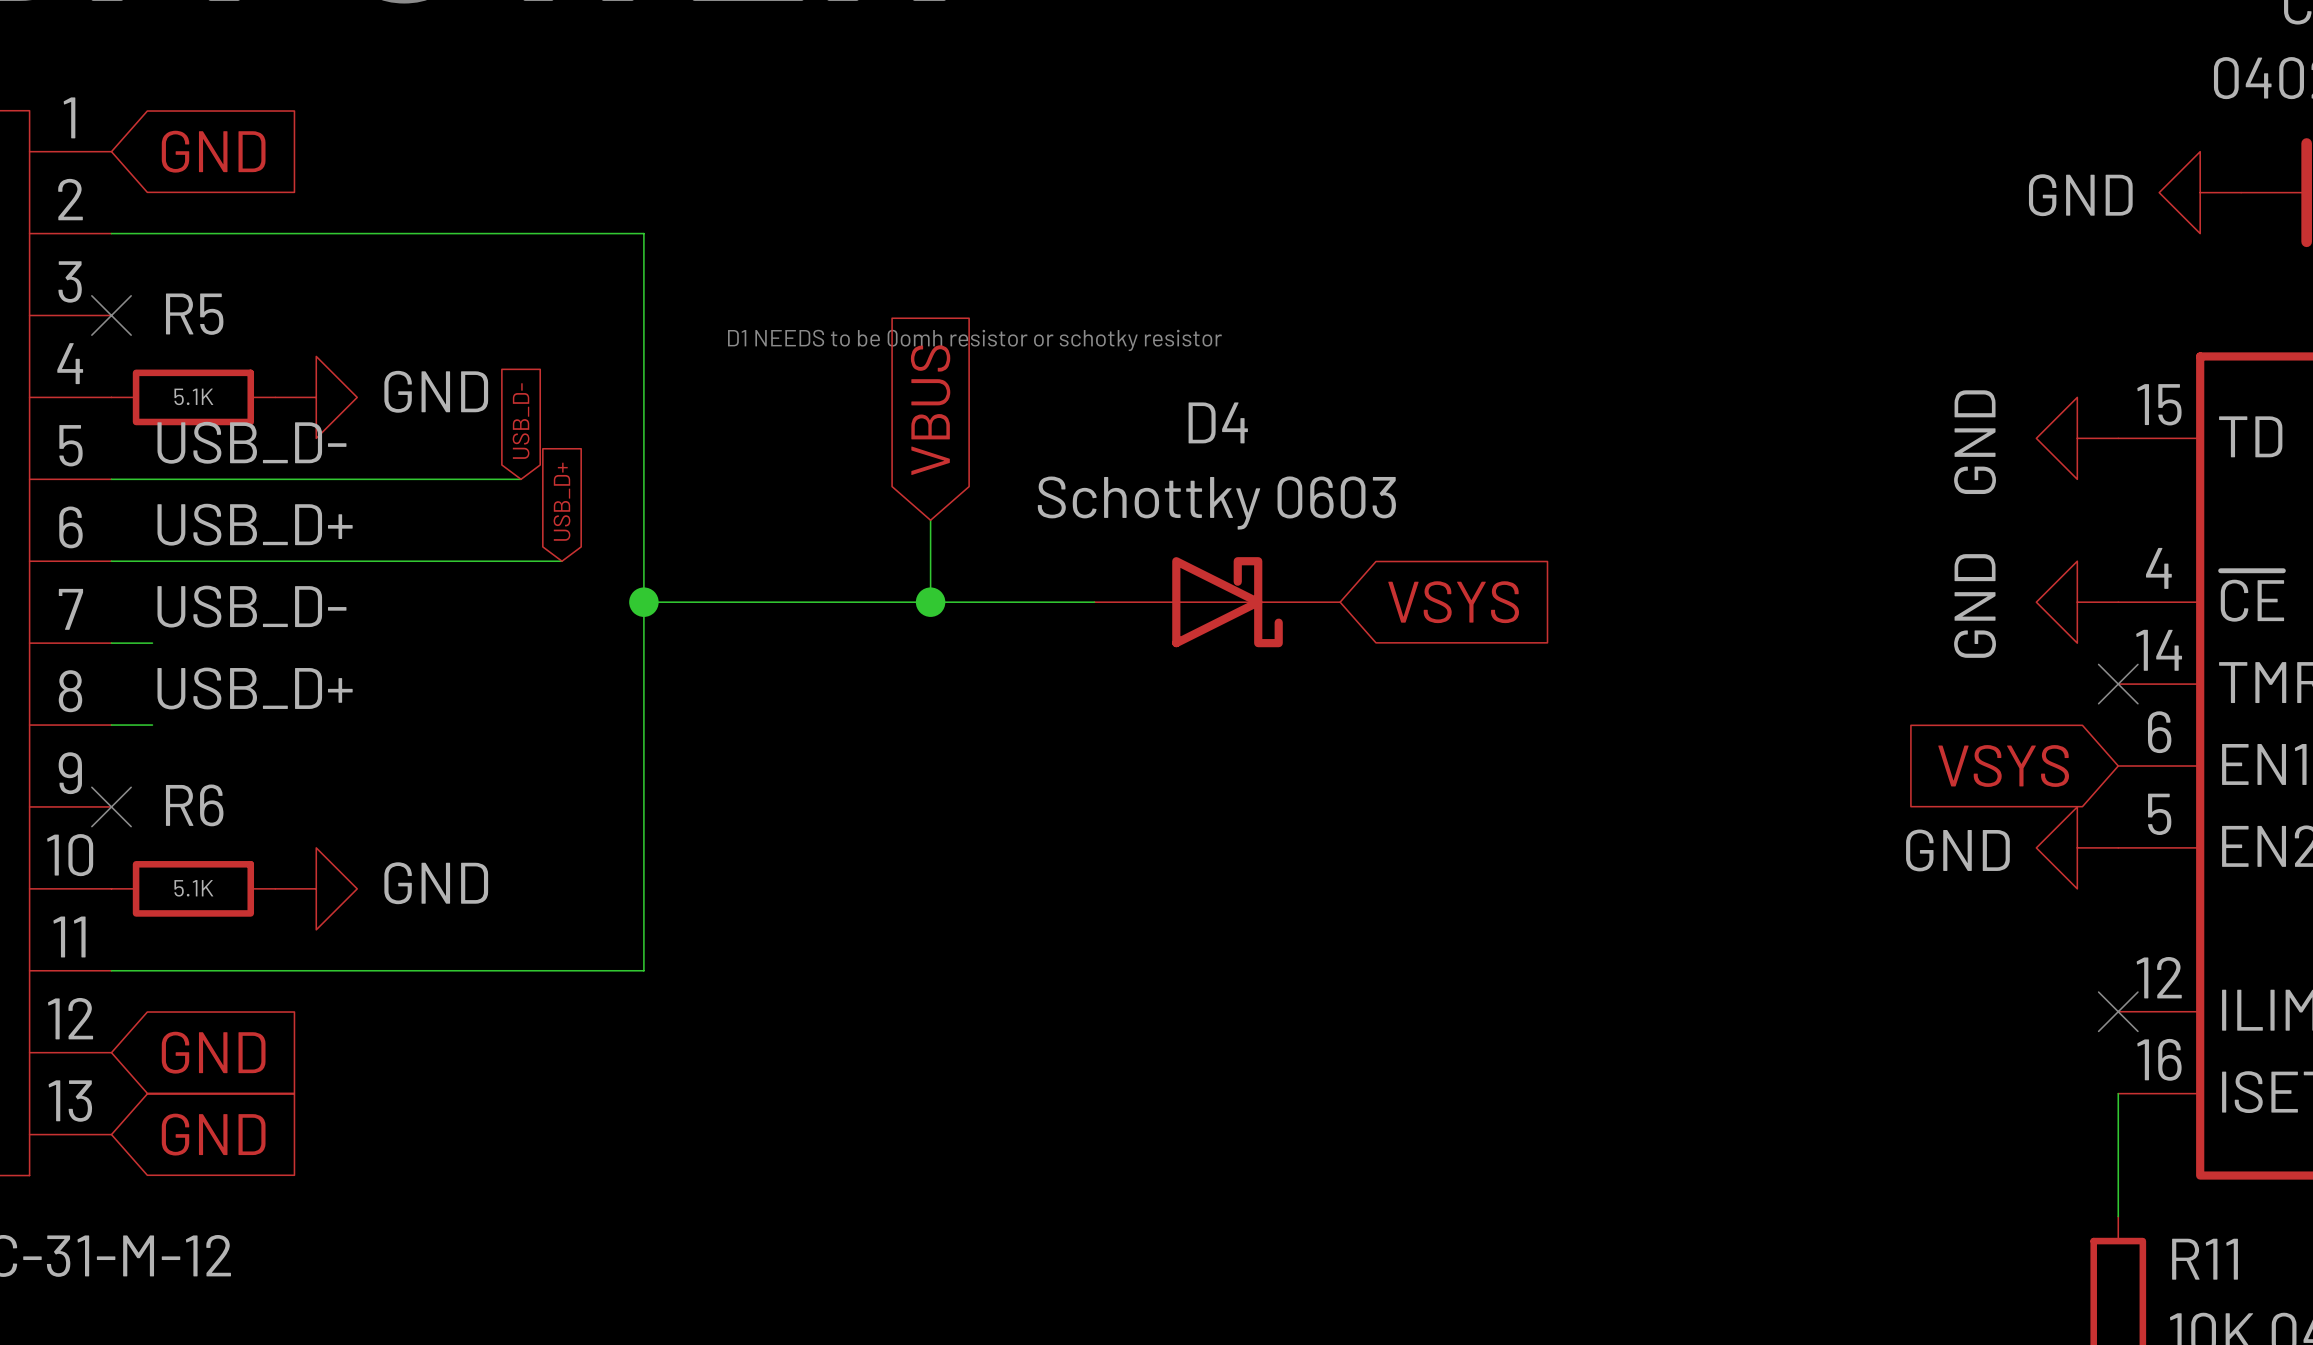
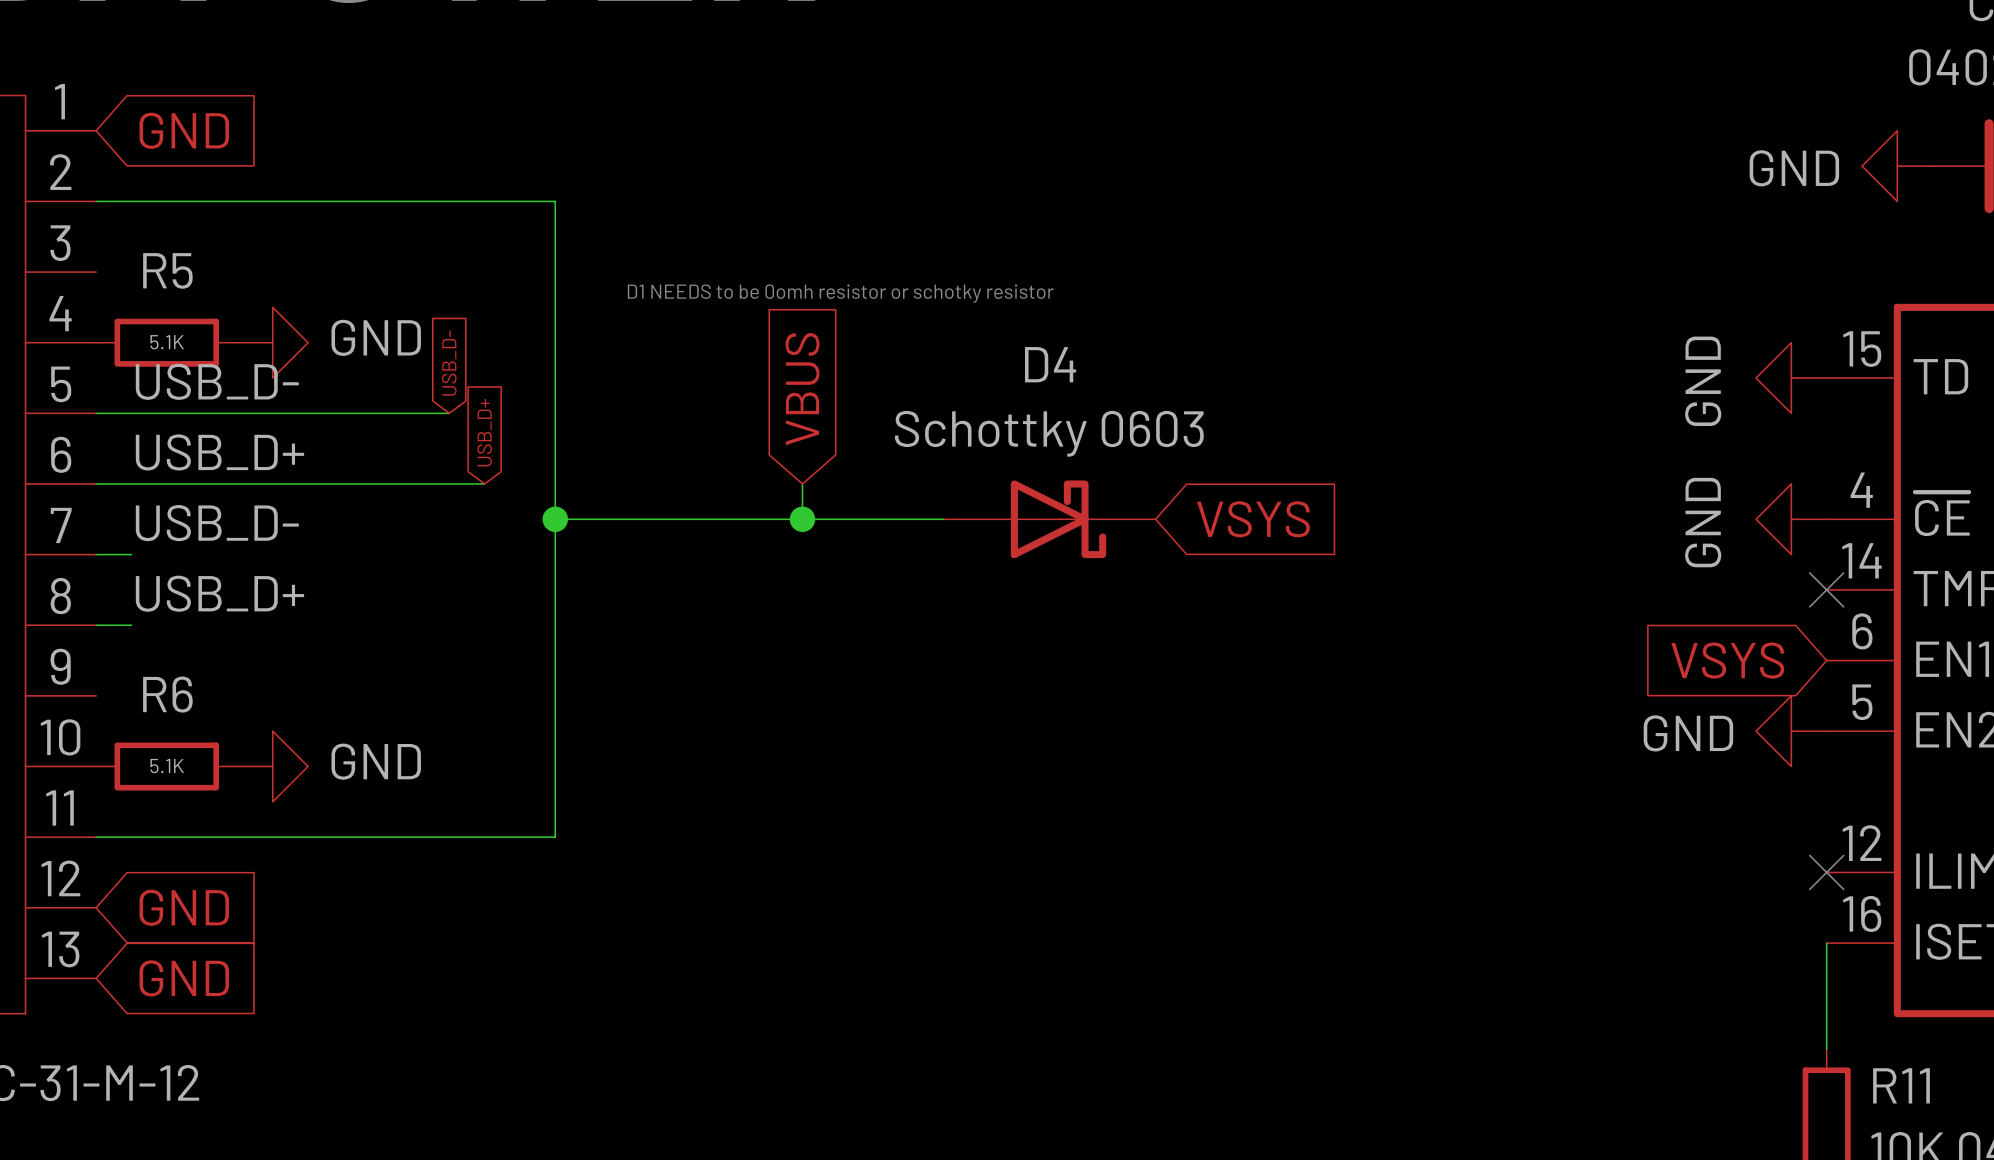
no-connect mark: (111, 315) -> none
global label position: VBUS (930, 410) -> VBUS (802, 389)
wire: (930, 520) (930, 561) -> none
no-connect mark: (111, 806) -> none

